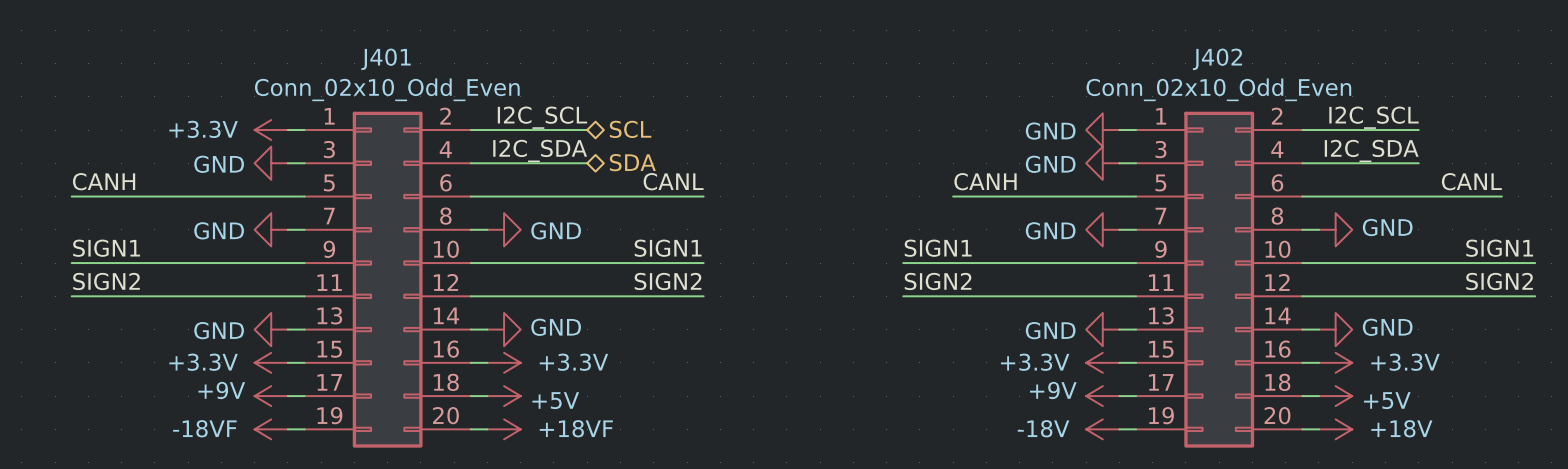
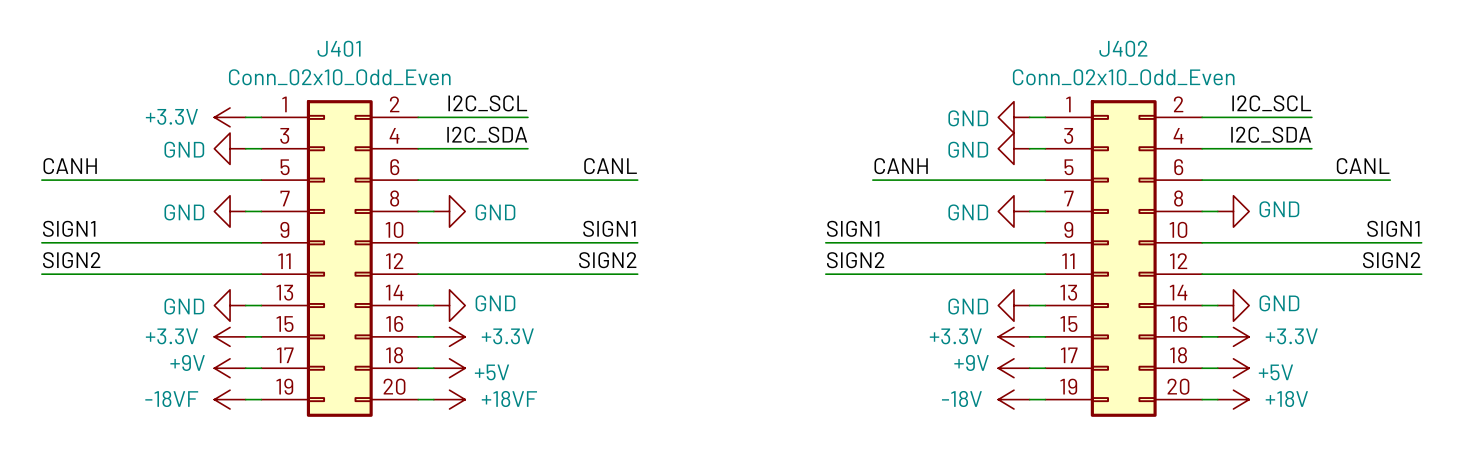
hierarchical label: SCL (630, 129) -> none
hierarchical label: SDA (632, 162) -> none

